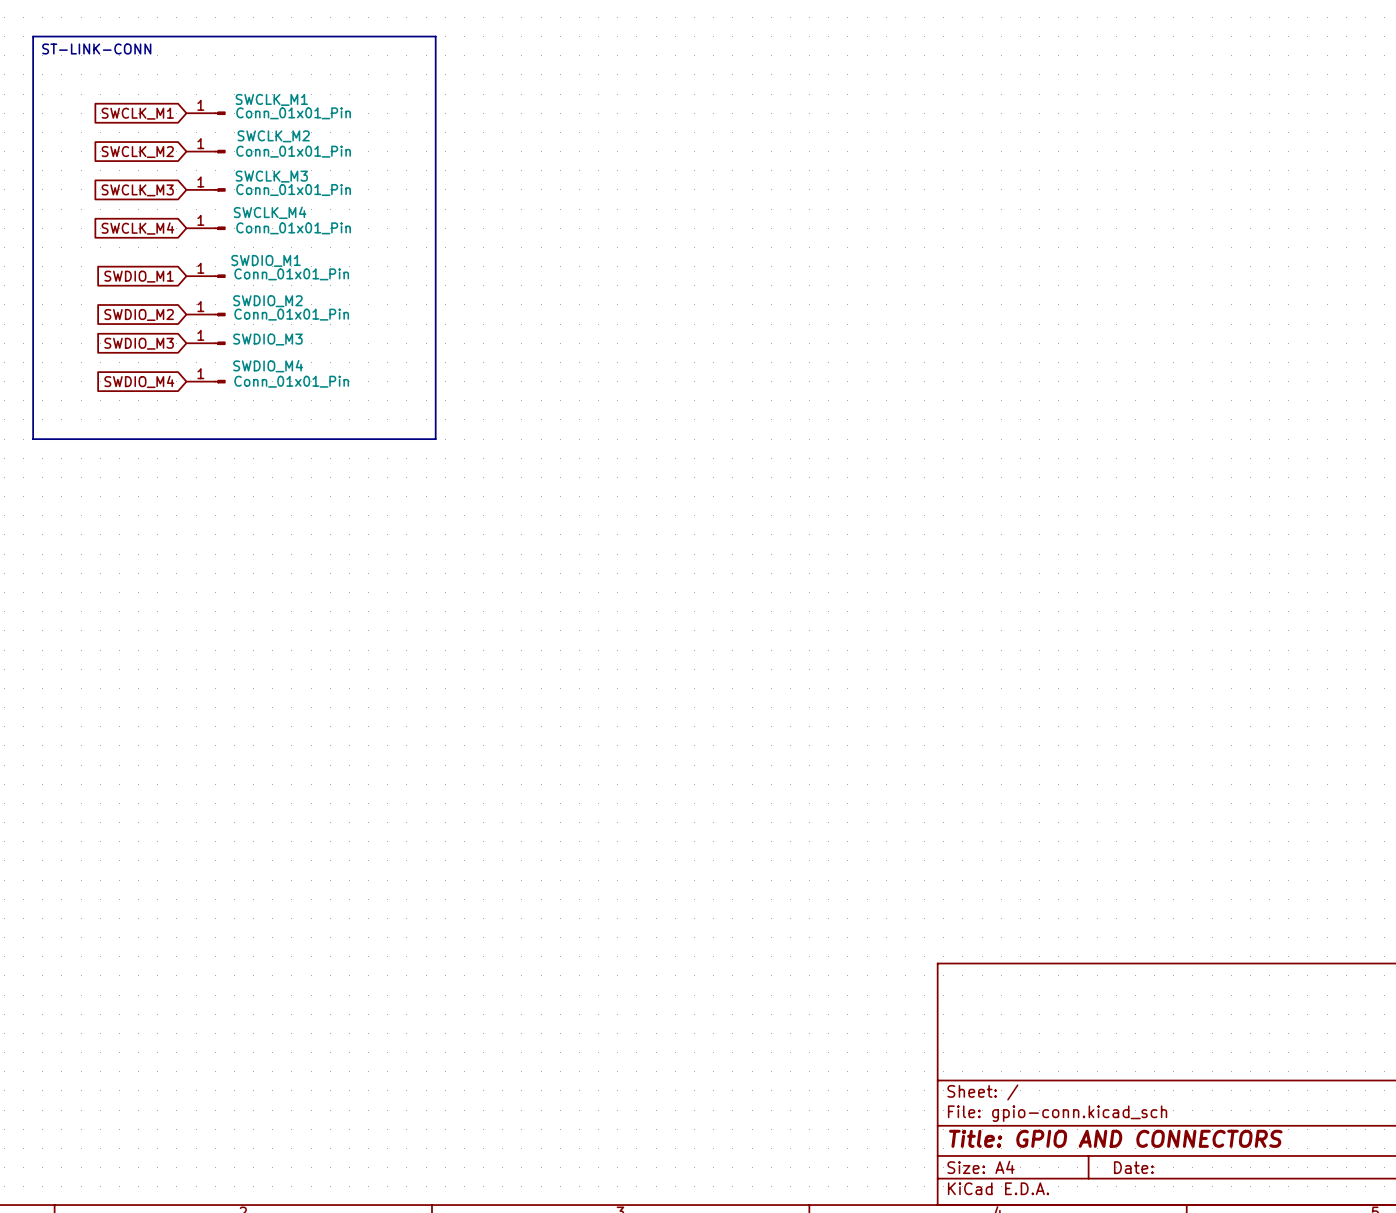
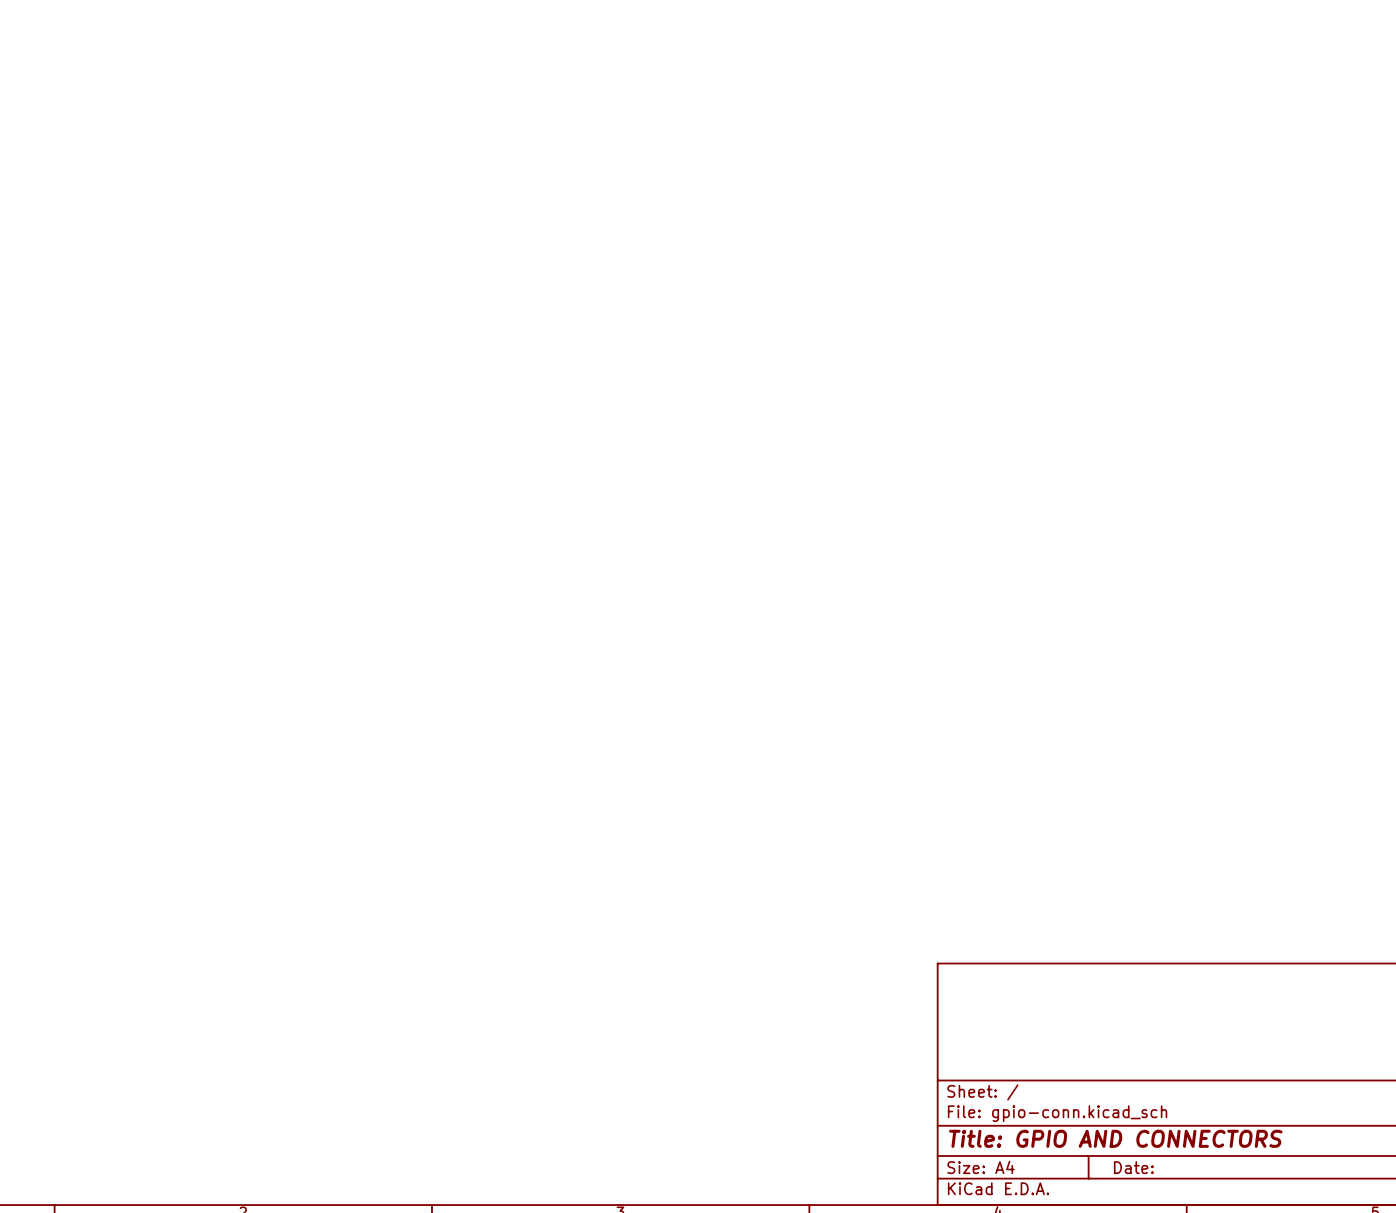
line: (33, 36) (435, 36) (435, 439) (33, 439) (33, 36) -> none
text: ST-LINK-CONN (96, 48) -> none
global label: SWCLK_M1 (137, 113) -> none
SWCLK_M1: Conn_01x01_Pin (205, 113) -> none
SWCLK_M2: Conn_01x01_Pin (205, 151) -> none
global label: SWCLK_M2 (137, 152) -> none
SWCLK_M3: Conn_01x01_Pin (205, 189) -> none
global label: SWCLK_M3 (137, 190) -> none
global label: SWCLK_M4 (137, 228) -> none
SWCLK_M4: Conn_01x01_Pin (205, 228) -> none
global label: SWDIO_M1 (139, 276) -> none
SWDIO_M1: Conn_01x01_Pin (205, 276) -> none
global label: SWDIO_M2 (139, 314) -> none
SWDIO_M2: Conn_01x01_Pin (205, 314) -> none
global label: SWDIO_M3 (139, 343) -> none
SWDIO_M3: (205, 343) -> none
global label: SWDIO_M4 (139, 381) -> none
SWDIO_M4: Conn_01x01_Pin (205, 381) -> none

